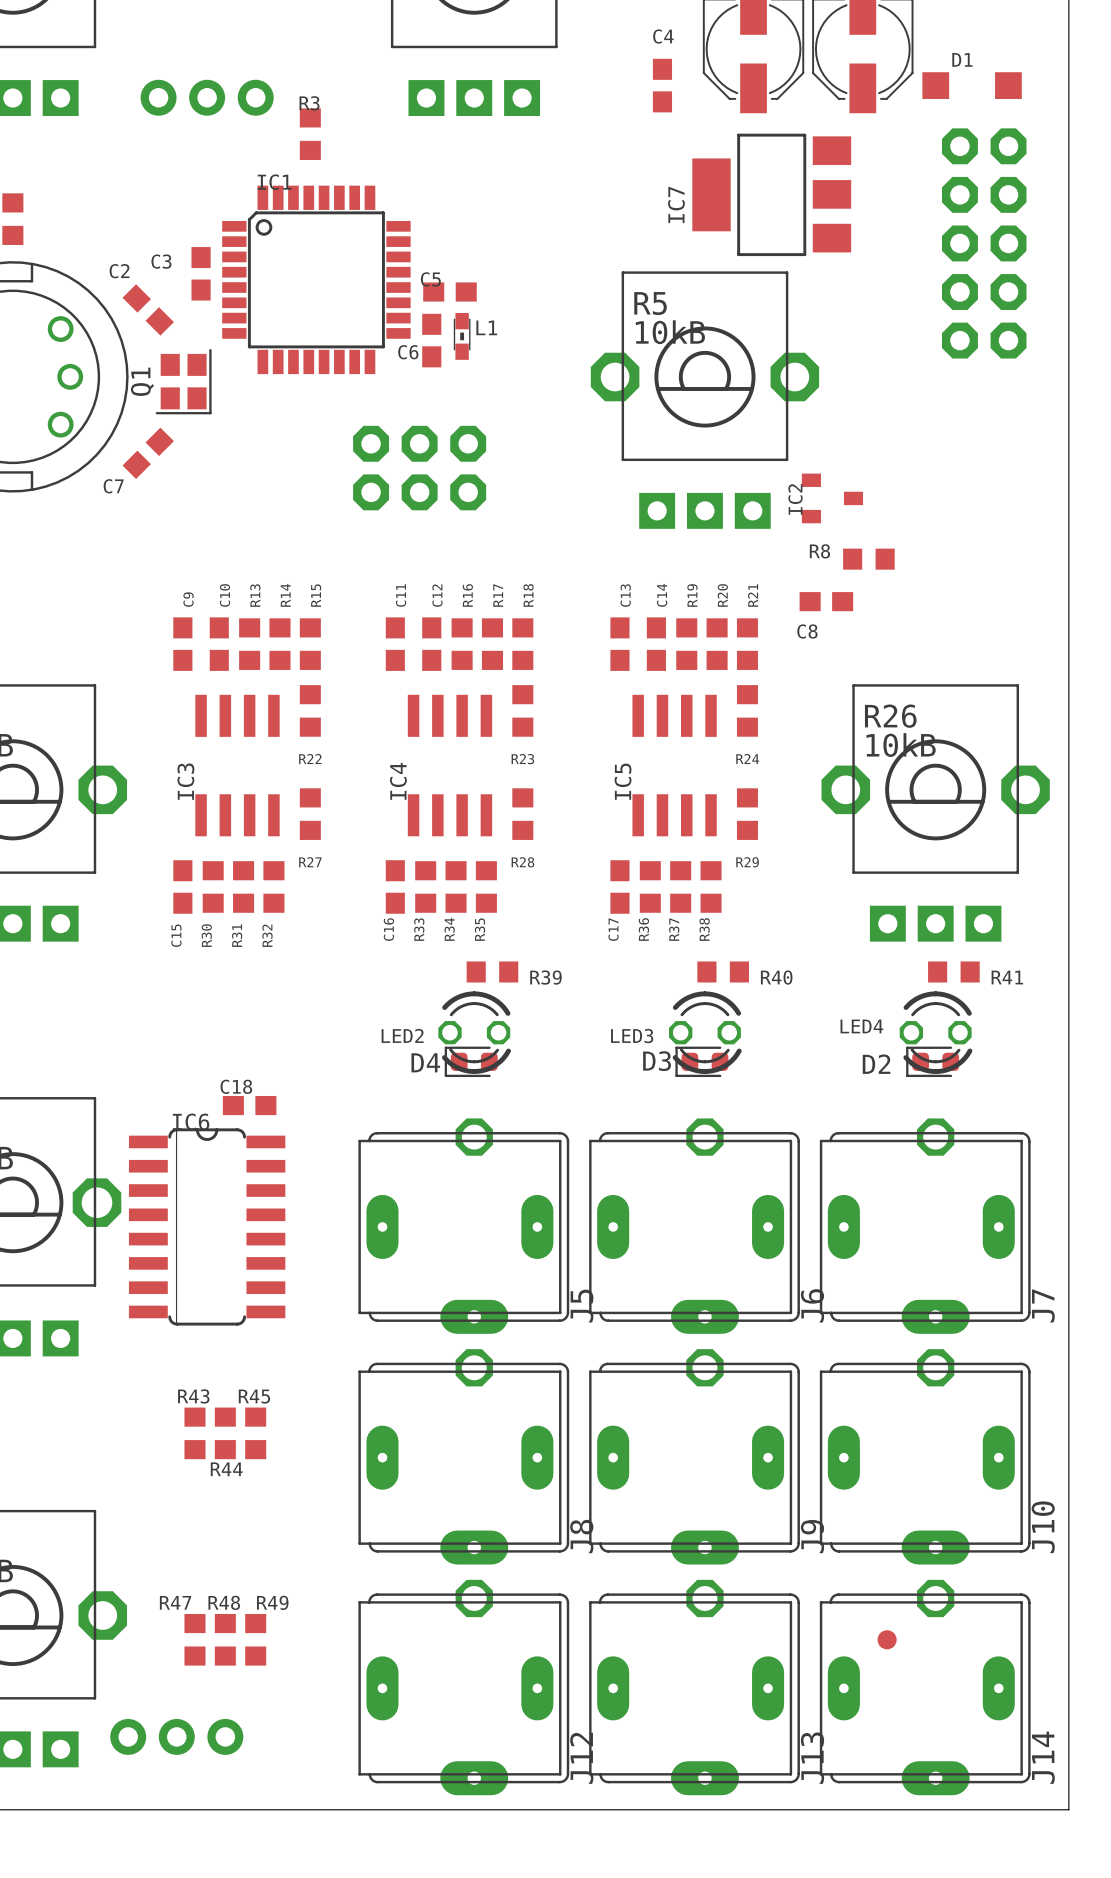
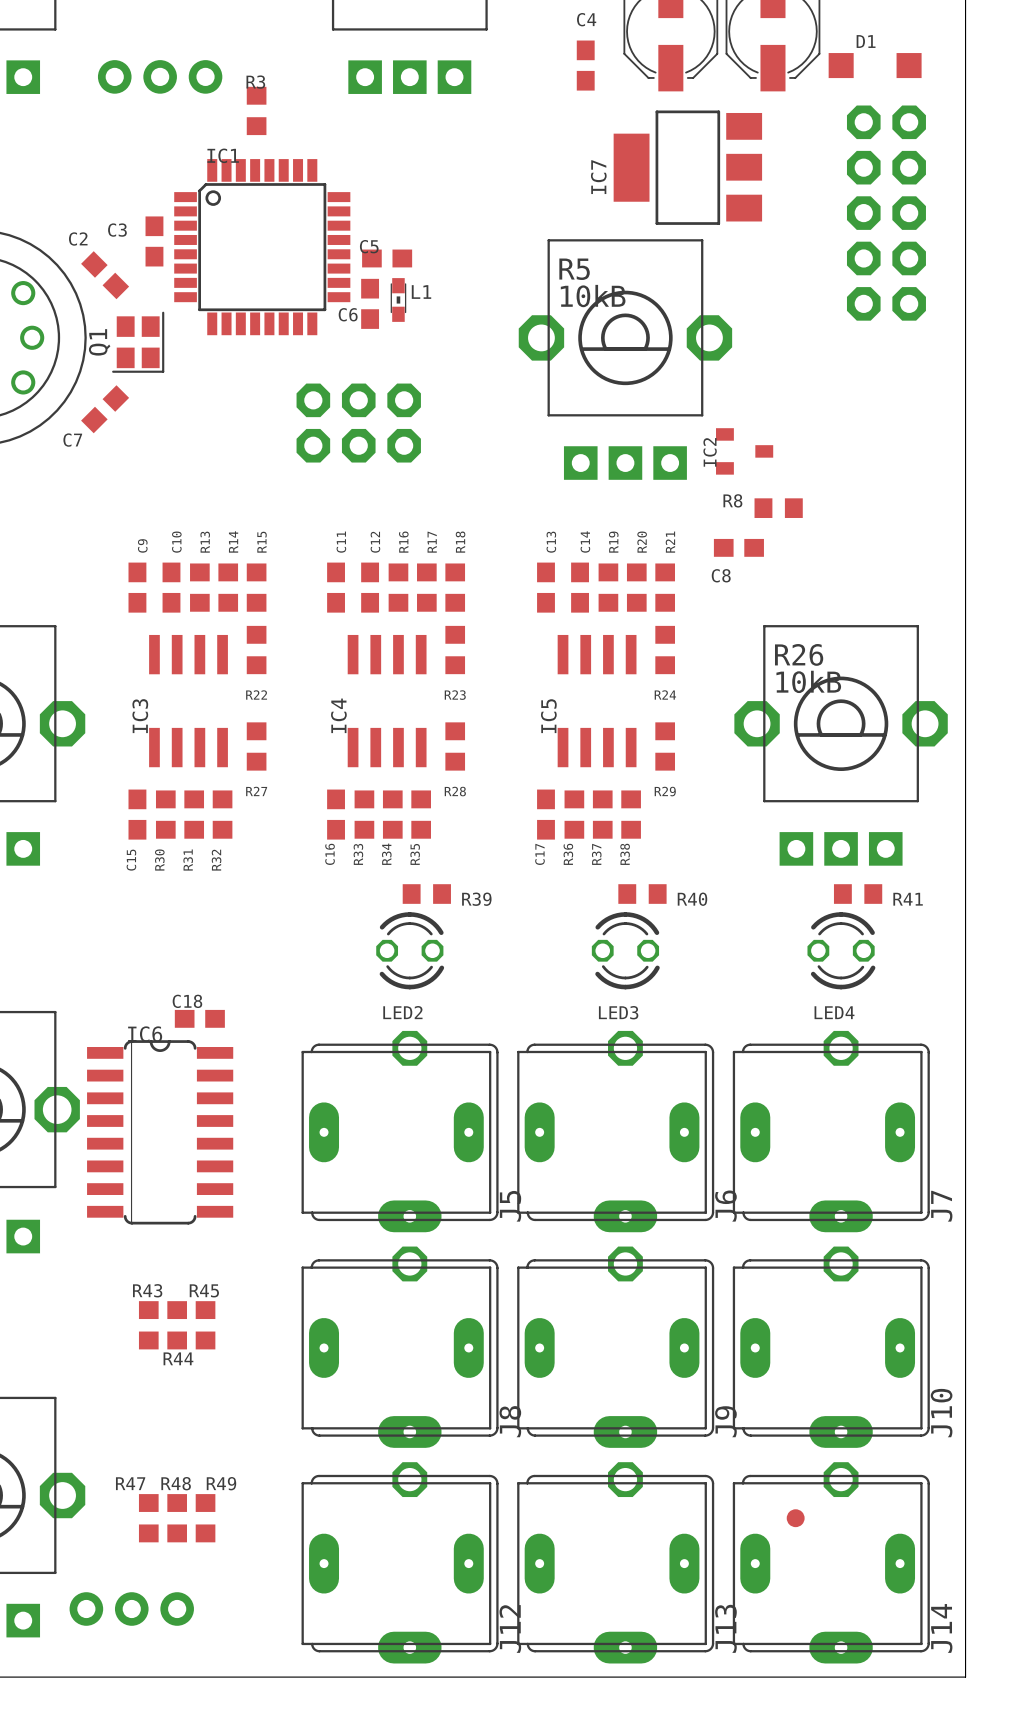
LED4 name position: LED4 (861, 1026) -> LED4 (834, 1012)
LED2 name position: LED2 (402, 1035) -> LED2 (402, 1012)
LED3 name position: LED3 (632, 1036) -> LED3 (618, 1012)
D4: (471, 1061) -> none
D3: (701, 1061) -> none
D2: (932, 1061) -> none

